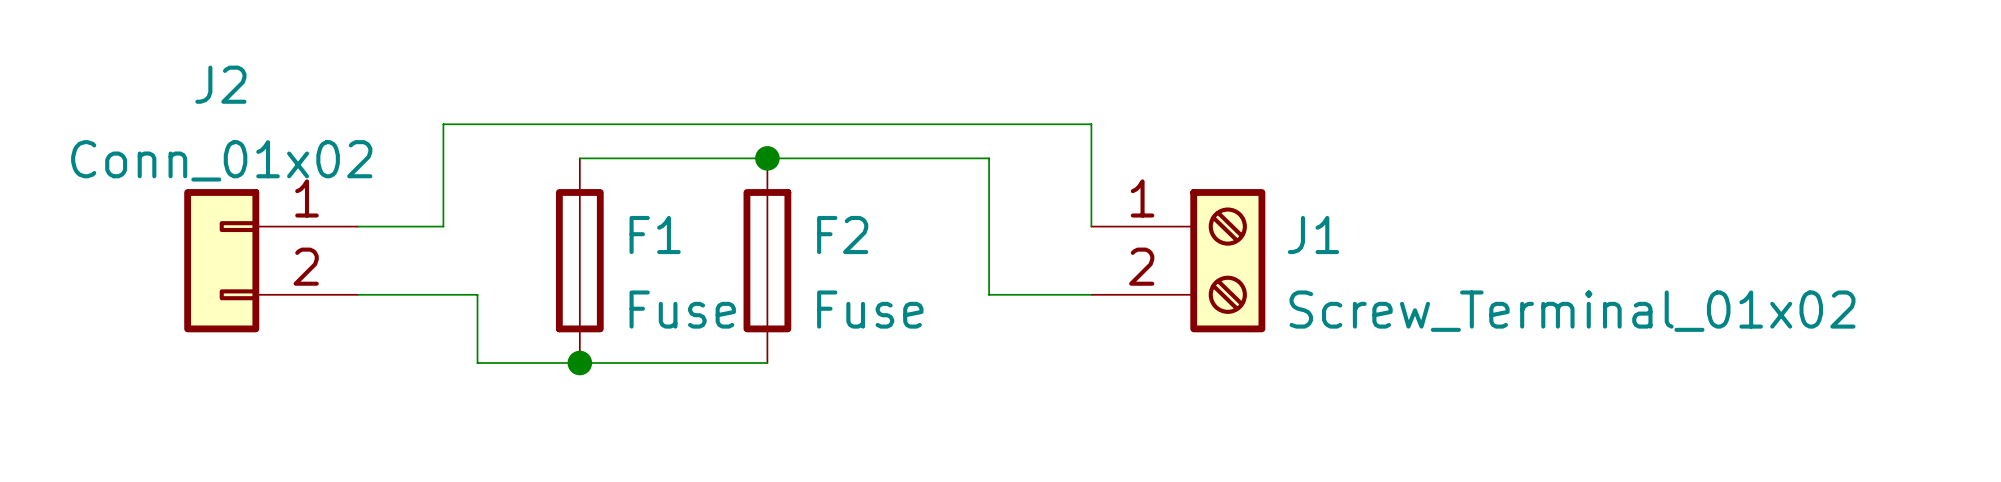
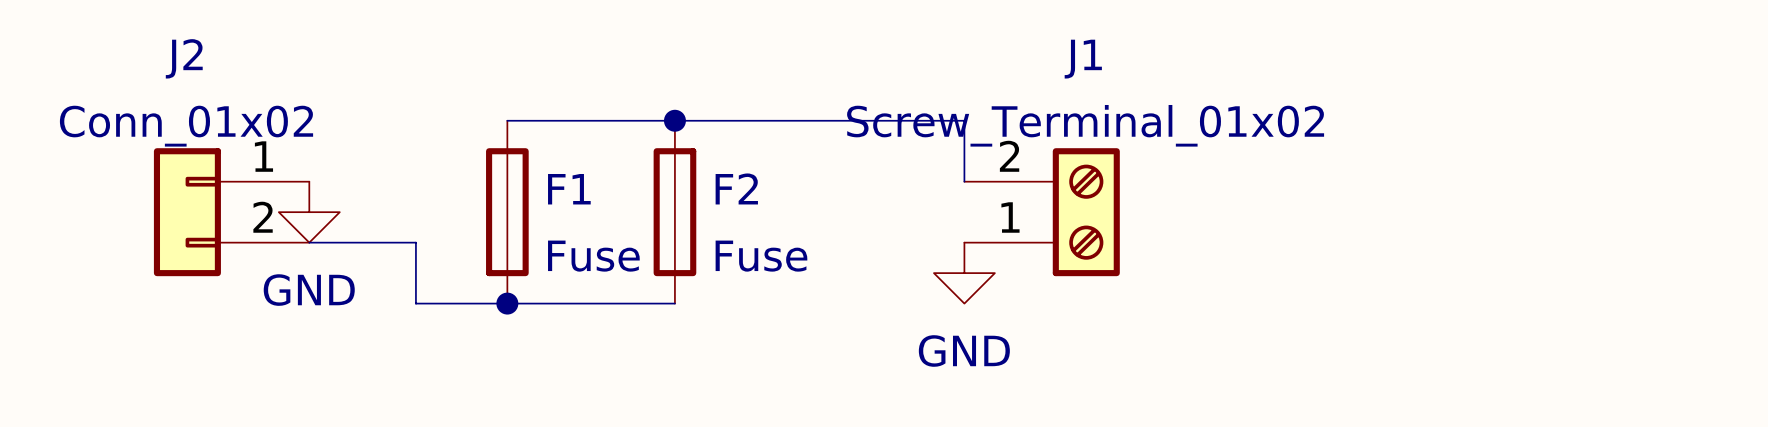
wire: (989, 158) (989, 294) (1091, 294) -> (873, 120) (964, 120)
wire: (1091, 158) (1091, 124) (443, 124) (443, 226) (358, 226) -> none
J1 name position: J1 (1313, 235) -> J1 (1083, 59)
power symbol: none -> GND (309, 212)
J1 flip: as is (1227, 260) -> up-down (1086, 212)
J1 value position: Screw_Terminal_01x02 (1572, 311) -> Screw_Terminal_01x02 (1085, 125)
power symbol: none -> GND (964, 273)

